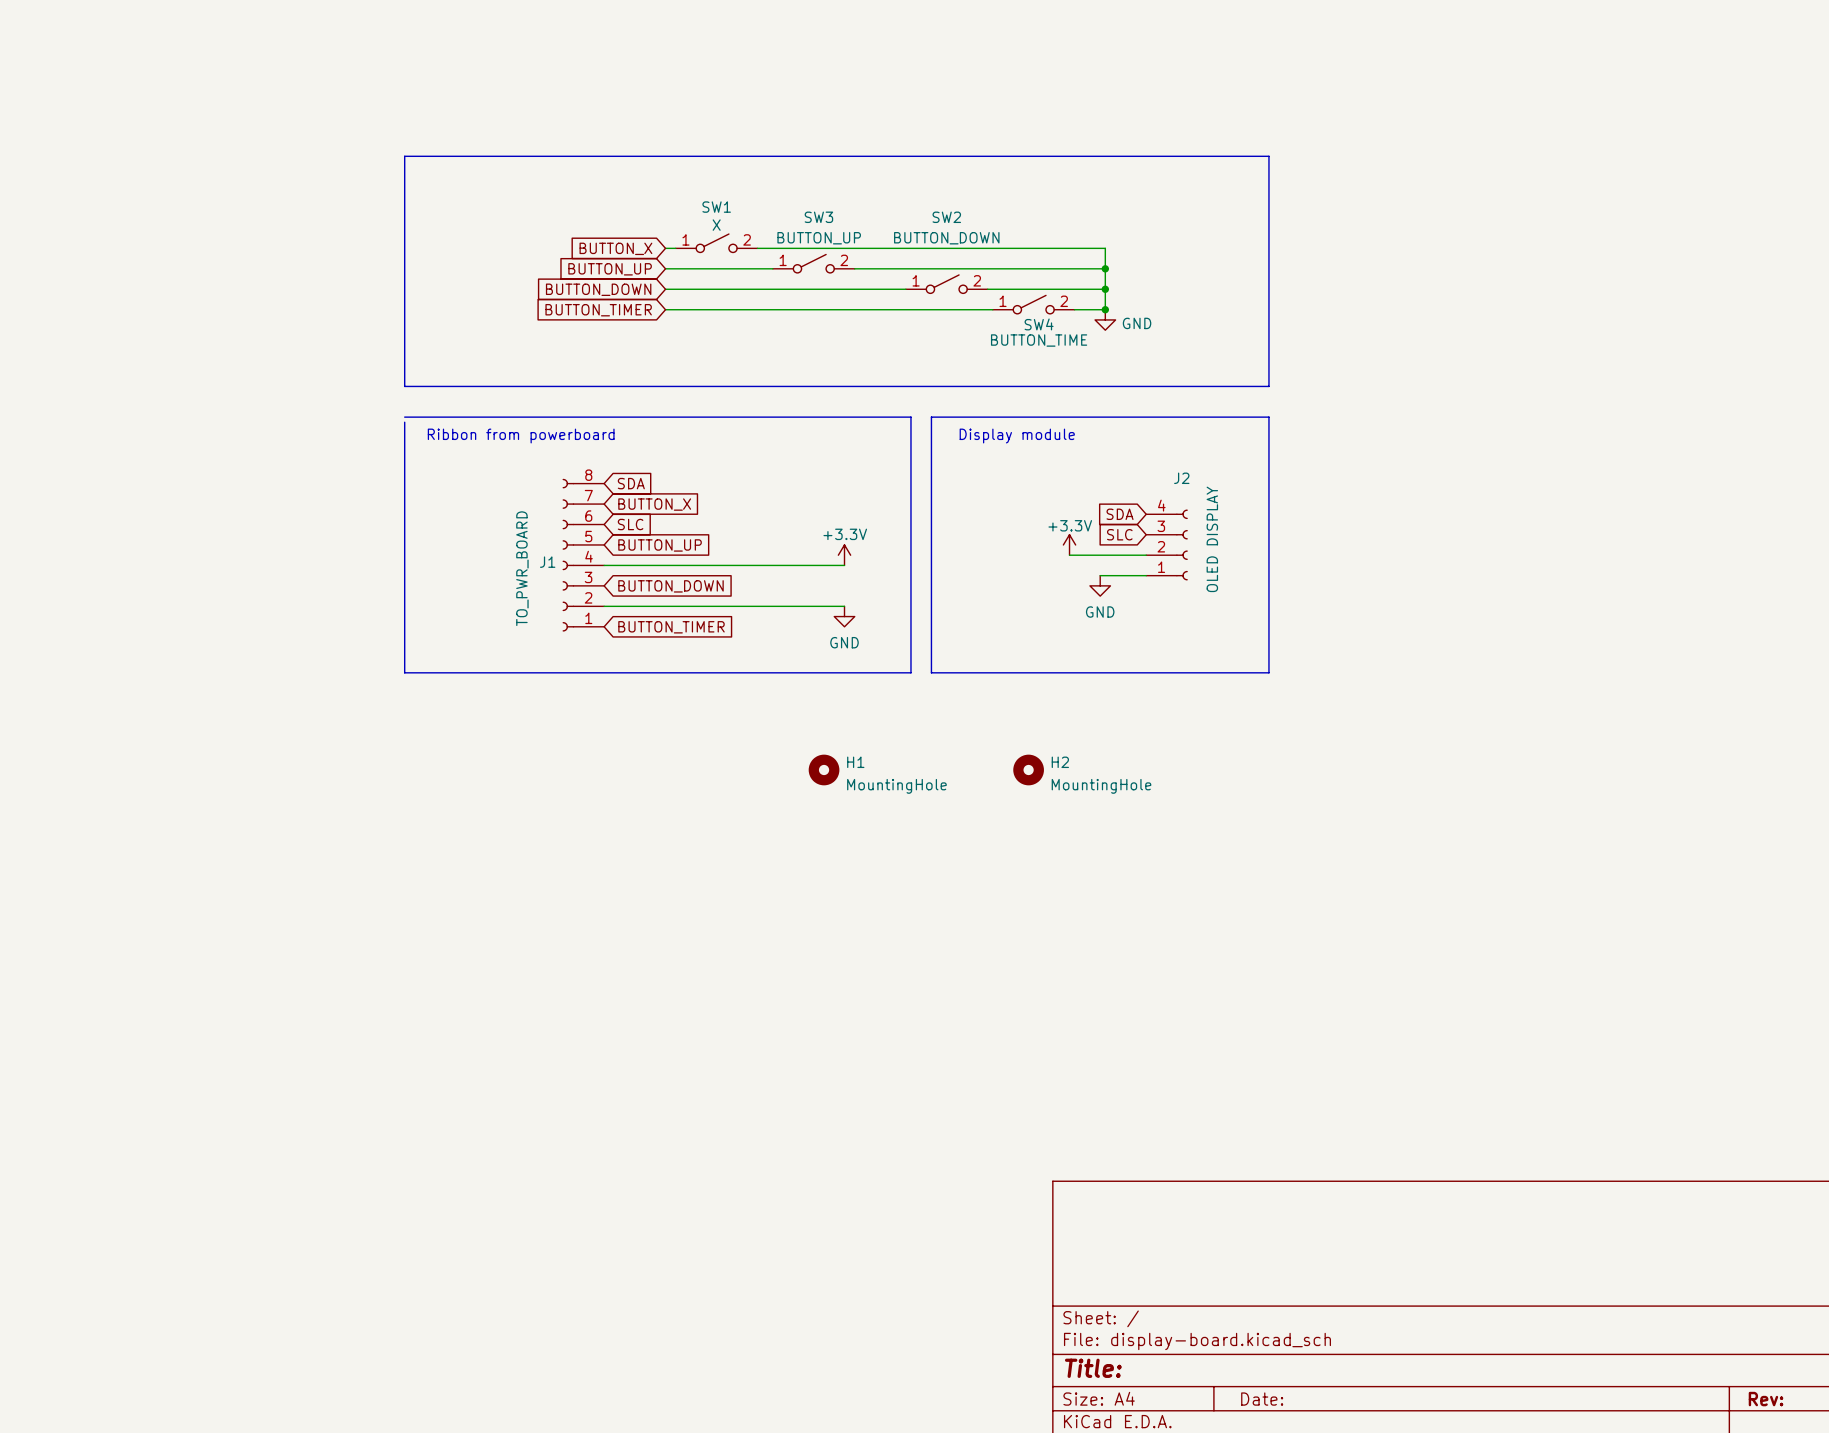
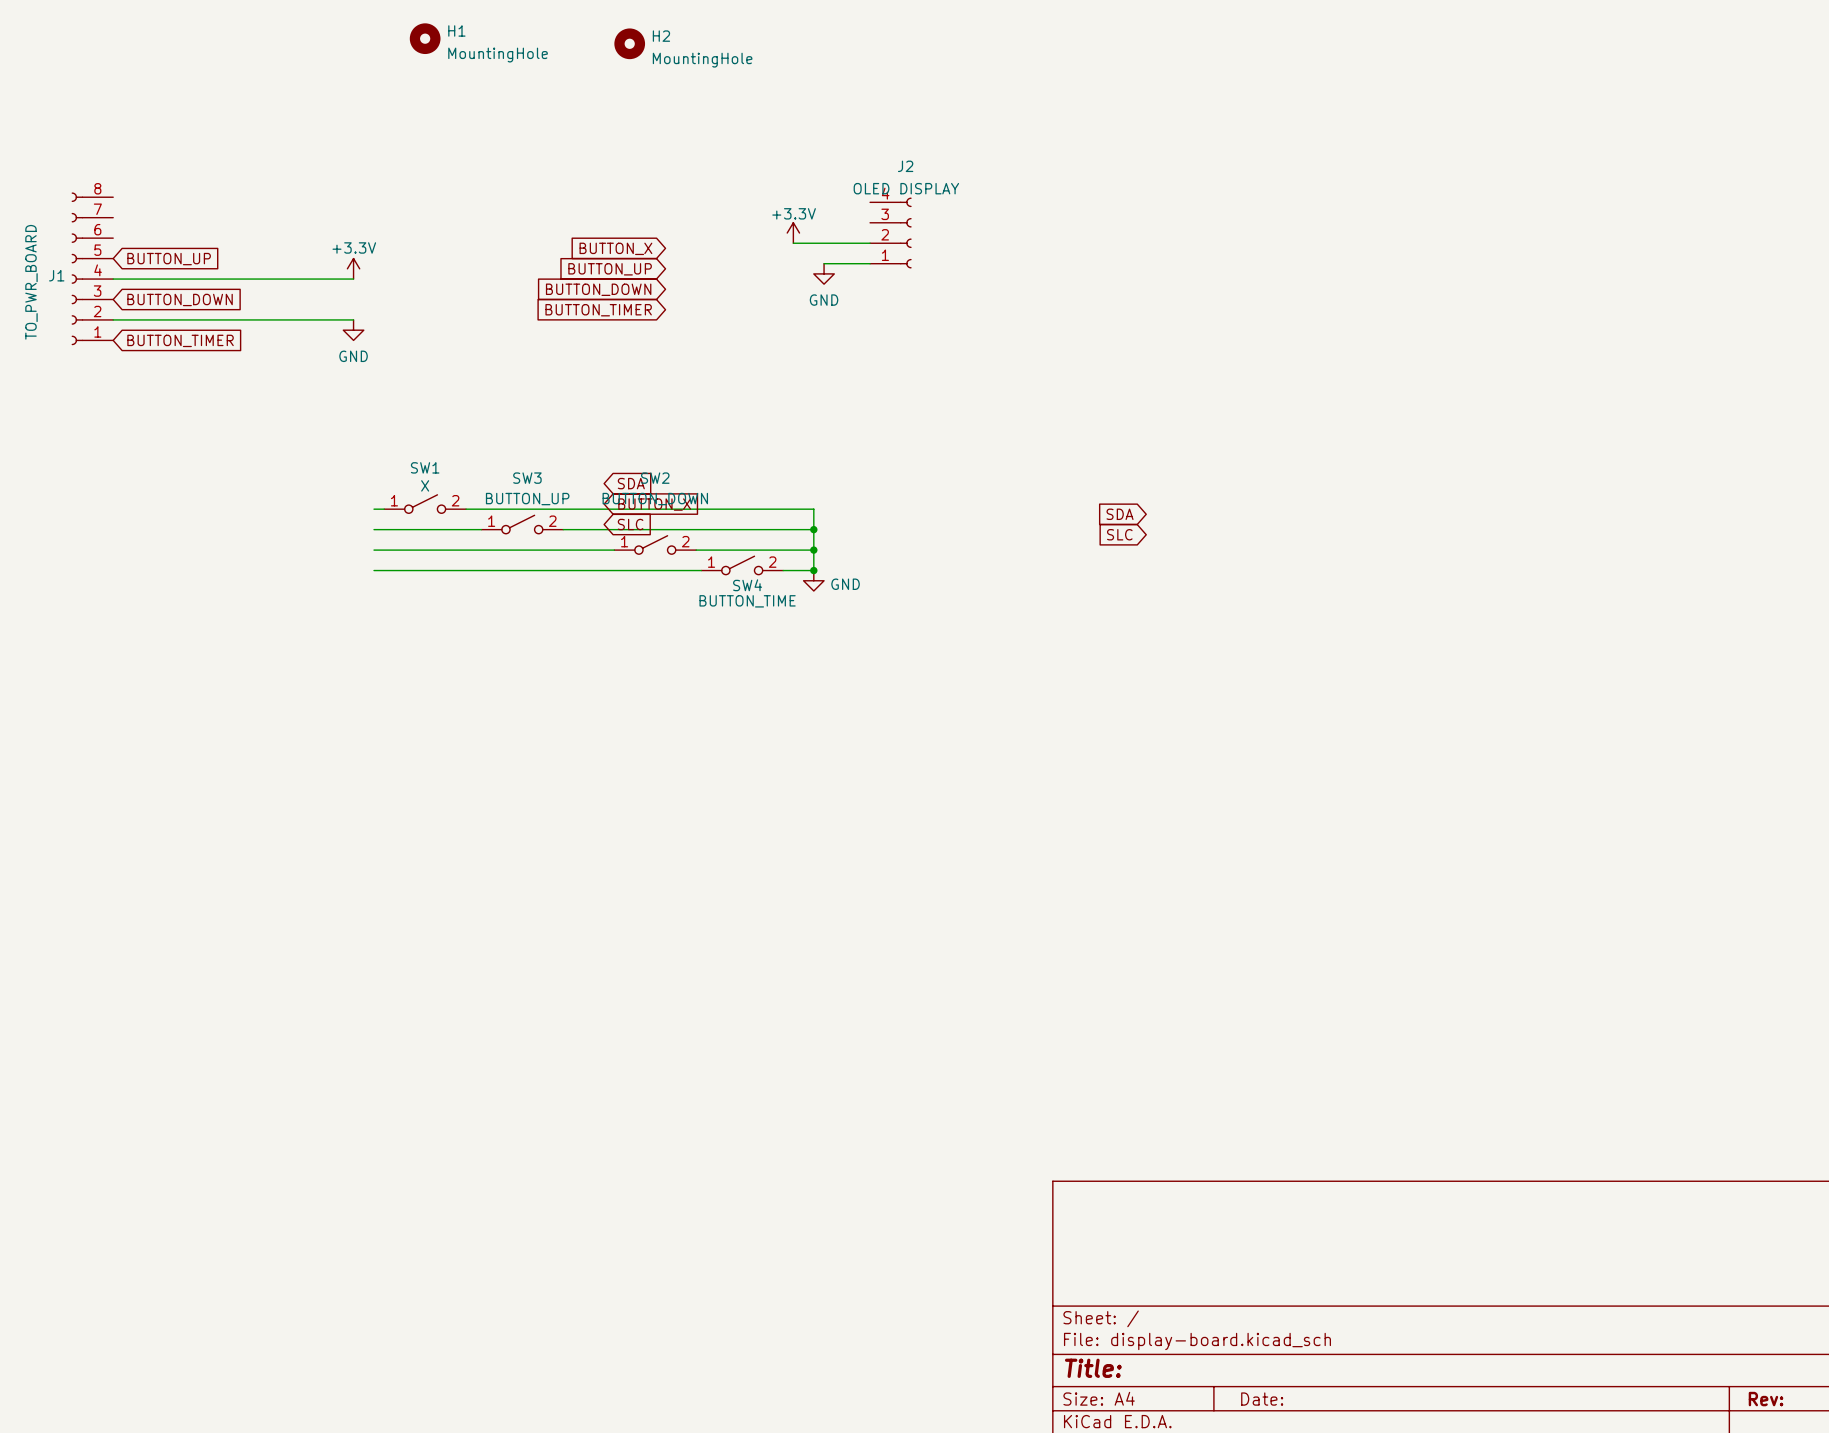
line: (404, 156) (404, 386) (1268, 386) (1268, 156) (404, 156) -> none
power symbol: none -> +3.3V (793, 233)
SW1 position: (716, 243) -> (425, 504)
wire: none -> (793, 243) (870, 243)
wire: (665, 248) (675, 248) -> none
wire: (757, 248) (1105, 248) (1105, 309) (1074, 309) -> none
global label: none -> BUTTON_UP (169, 259)
SW3 position: (813, 263) -> (522, 524)
wire: none -> (824, 263) (870, 263)
power symbol: none -> +3.3V (353, 268)
wire: (665, 268) (772, 268) -> none
wire: (854, 268) (1105, 268) -> none
junction: (1105, 268) -> none
power symbol: none -> GND (824, 273)
wire: none -> (113, 279) (353, 279)
SW2 position: (946, 284) -> (655, 544)
wire: (665, 289) (905, 289) -> none
wire: (987, 289) (1105, 289) -> none
junction: (1105, 289) -> none
global label: none -> BUTTON_DOWN (180, 299)
SW4 position: (1033, 304) -> (742, 565)
wire: (665, 309) (992, 309) -> none
junction: (1105, 309) -> none
wire: none -> (113, 319) (353, 319)
power symbol: GND (1105, 319) -> none
power symbol: none -> GND (353, 330)
global label: none -> BUTTON_TIMER (180, 340)
line: (404, 417) (910, 417) (910, 672) (404, 672) (404, 422) -> none
line: (931, 417) (1268, 417) (1268, 672) (931, 672) (931, 417) -> none
text: Ribbon from powerboard (521, 436) -> none
text: Display module (1017, 436) -> none
wire: none -> (374, 509) (384, 509)
wire: none -> (466, 509) (813, 509) (813, 570) (783, 570)
wire: none -> (374, 529) (481, 529)
wire: none -> (563, 529) (813, 529)
junction: none -> (813, 529)
J2 value rotation: 0° (1212, 539) -> 90° clockwise (906, 188)
power symbol: +3.3V (1069, 544) -> none
J2 position: (1166, 544) -> (890, 233)
global label: BUTTON_UP (660, 545) -> none
wire: none -> (374, 550) (614, 550)
wire: none -> (696, 550) (813, 550)
junction: none -> (813, 550)
J1 position: (583, 555) -> (92, 268)
power symbol: +3.3V (844, 555) -> none
wire: (1069, 555) (1146, 555) -> none
wire: (604, 565) (844, 565) -> none
wire: none -> (374, 570) (701, 570)
junction: none -> (813, 570)
wire: (1100, 575) (1146, 575) -> none
power symbol: GND (1100, 585) -> none
global label: BUTTON_DOWN (671, 586) -> none
wire: (604, 606) (844, 606) -> none
power symbol position: GND (844, 616) -> GND (813, 580)
global label: BUTTON_TIMER (671, 627) -> none
power symbol text position: GND (844, 642) -> GND (845, 584)
H1 position: (824, 769) -> (425, 38)
H2 position: (1028, 769) -> (629, 43)

